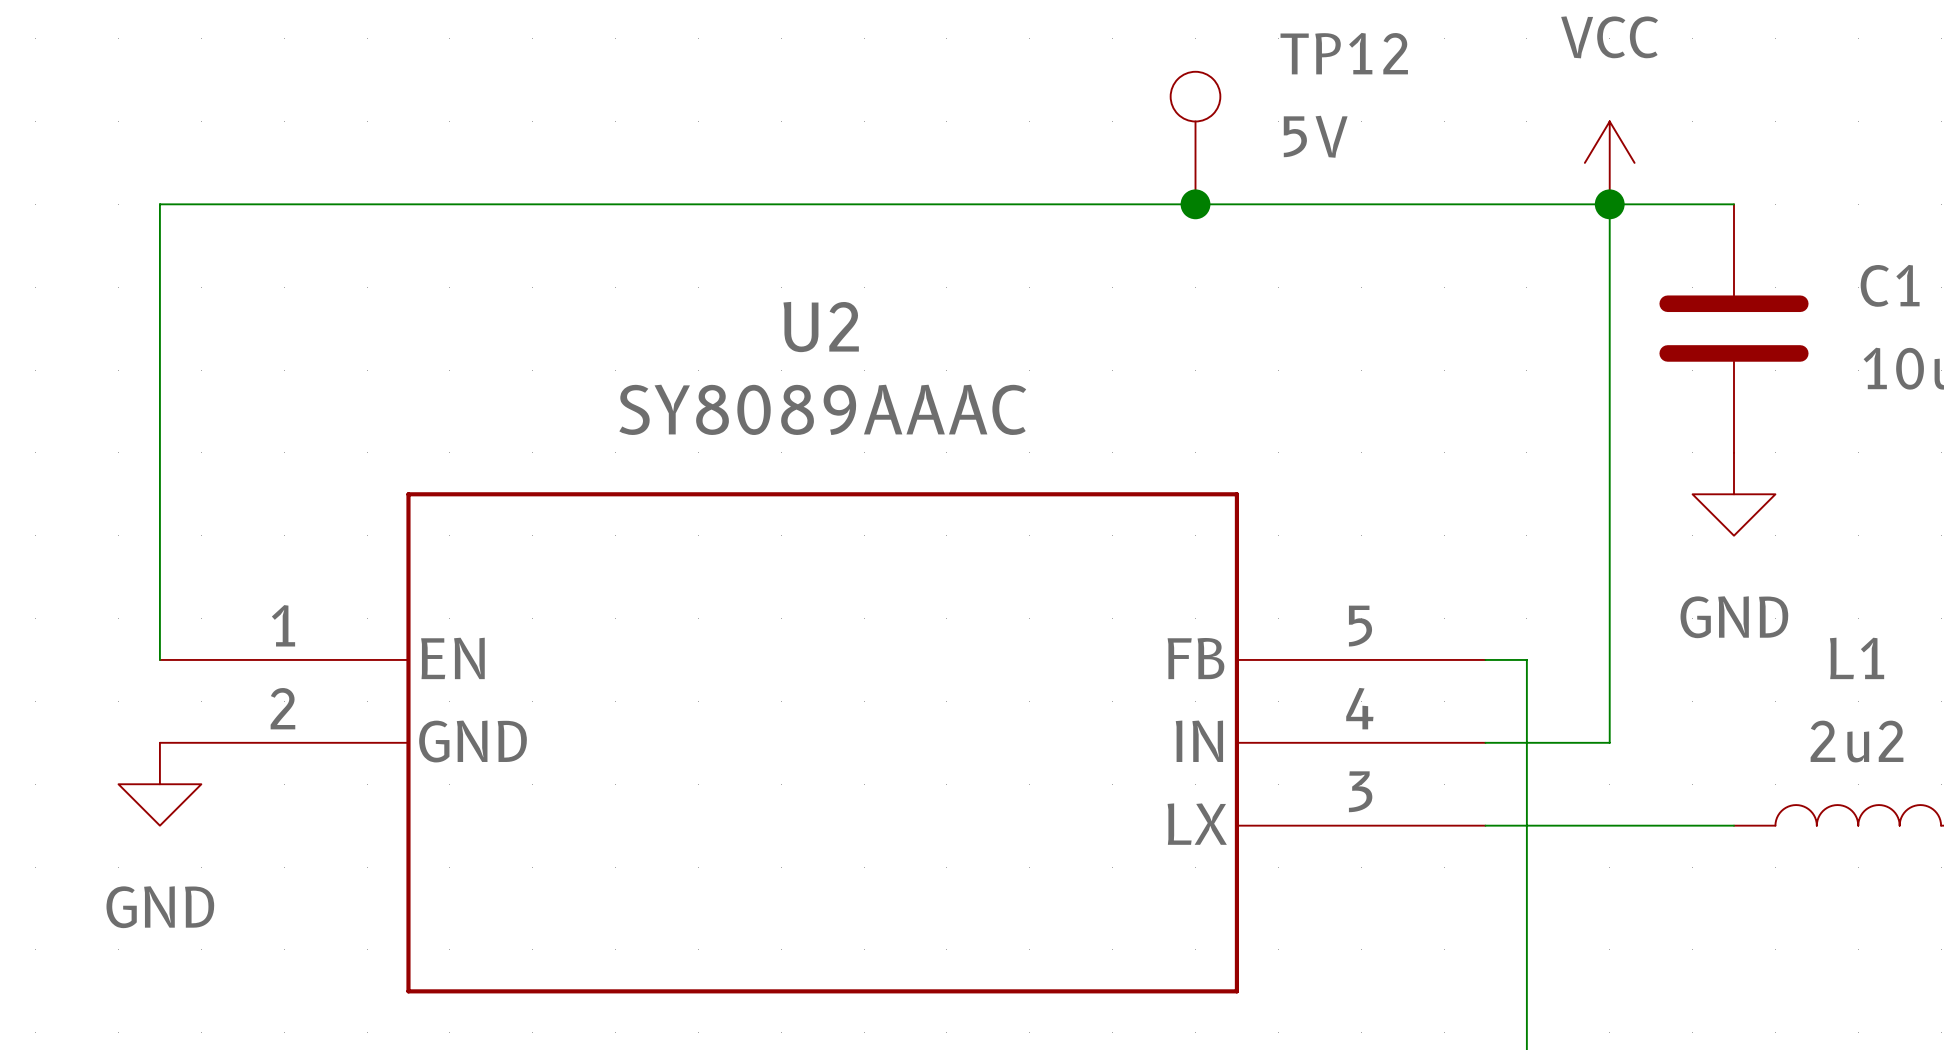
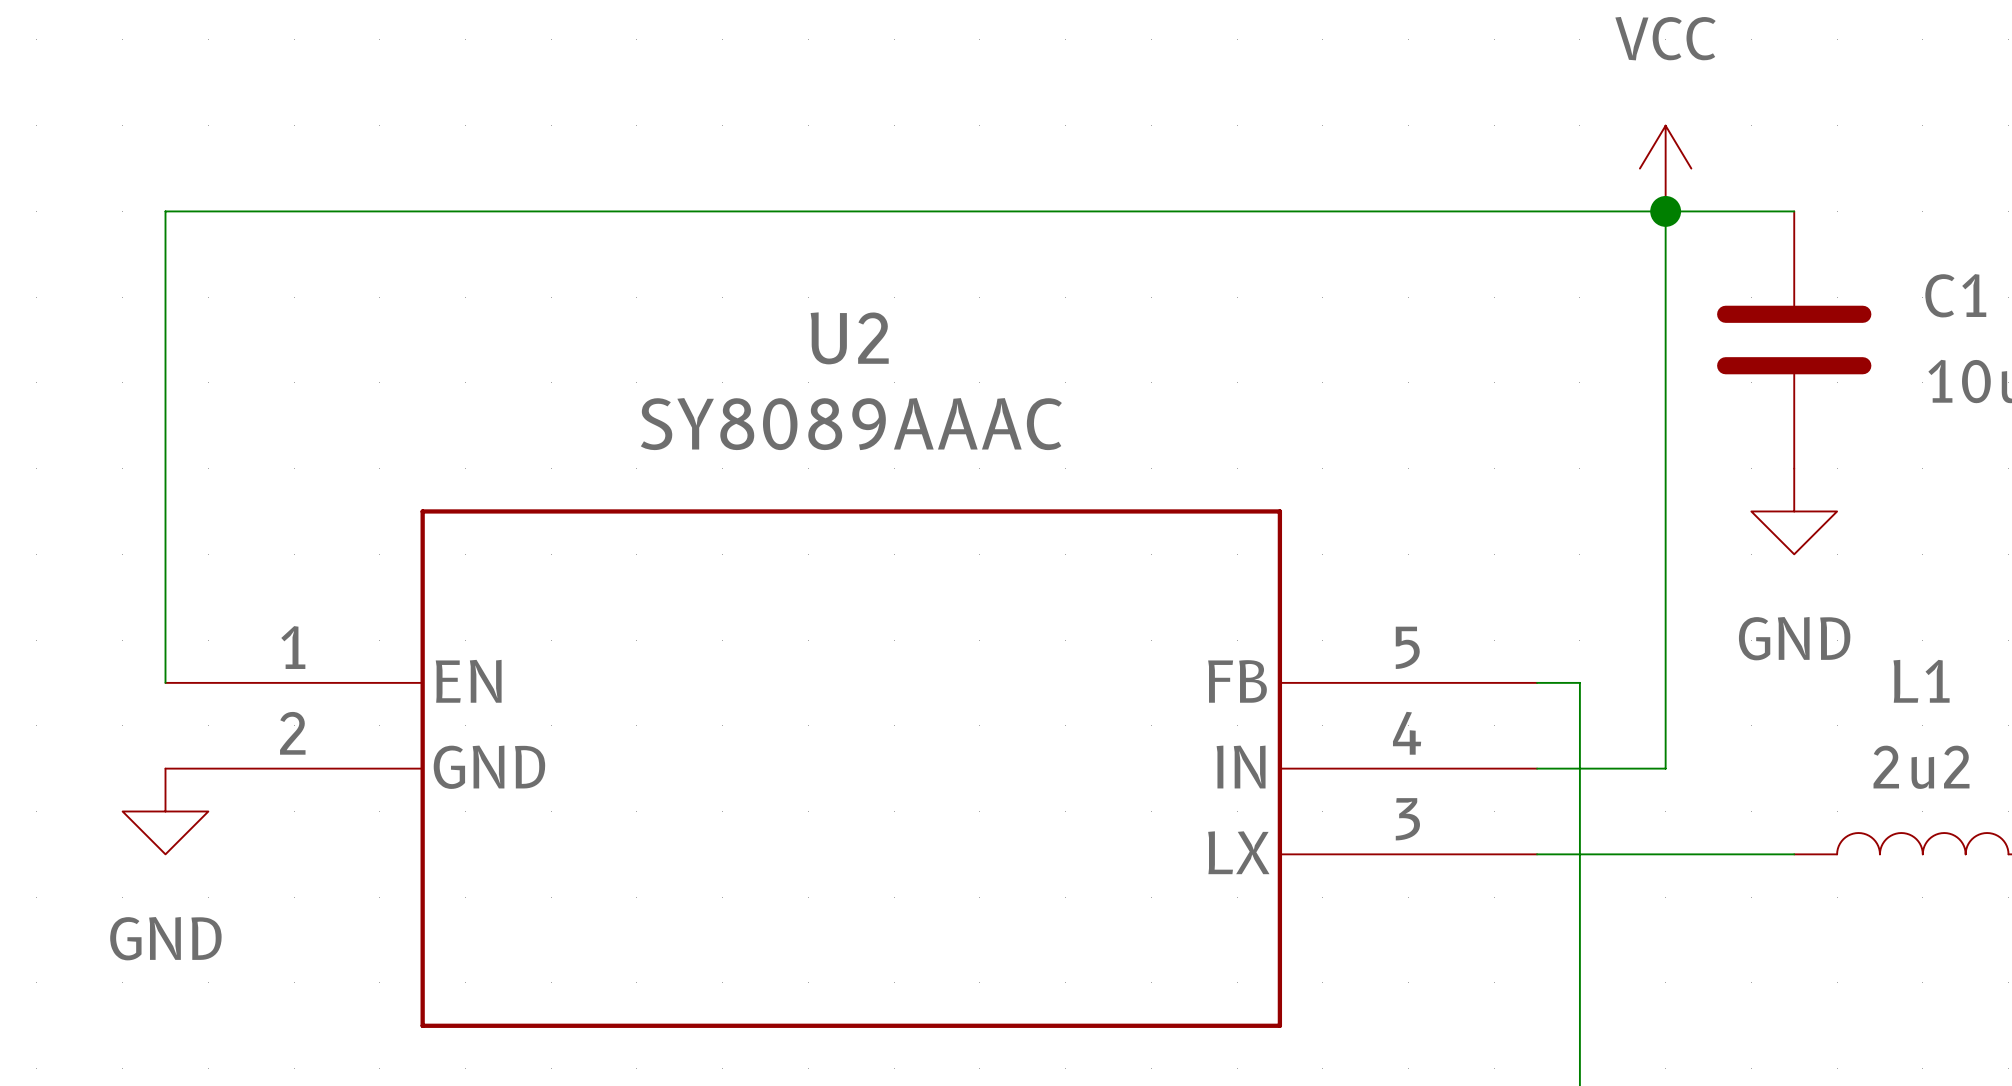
TP12: 5V (1195, 138) -> none
junction: (1195, 204) -> none

